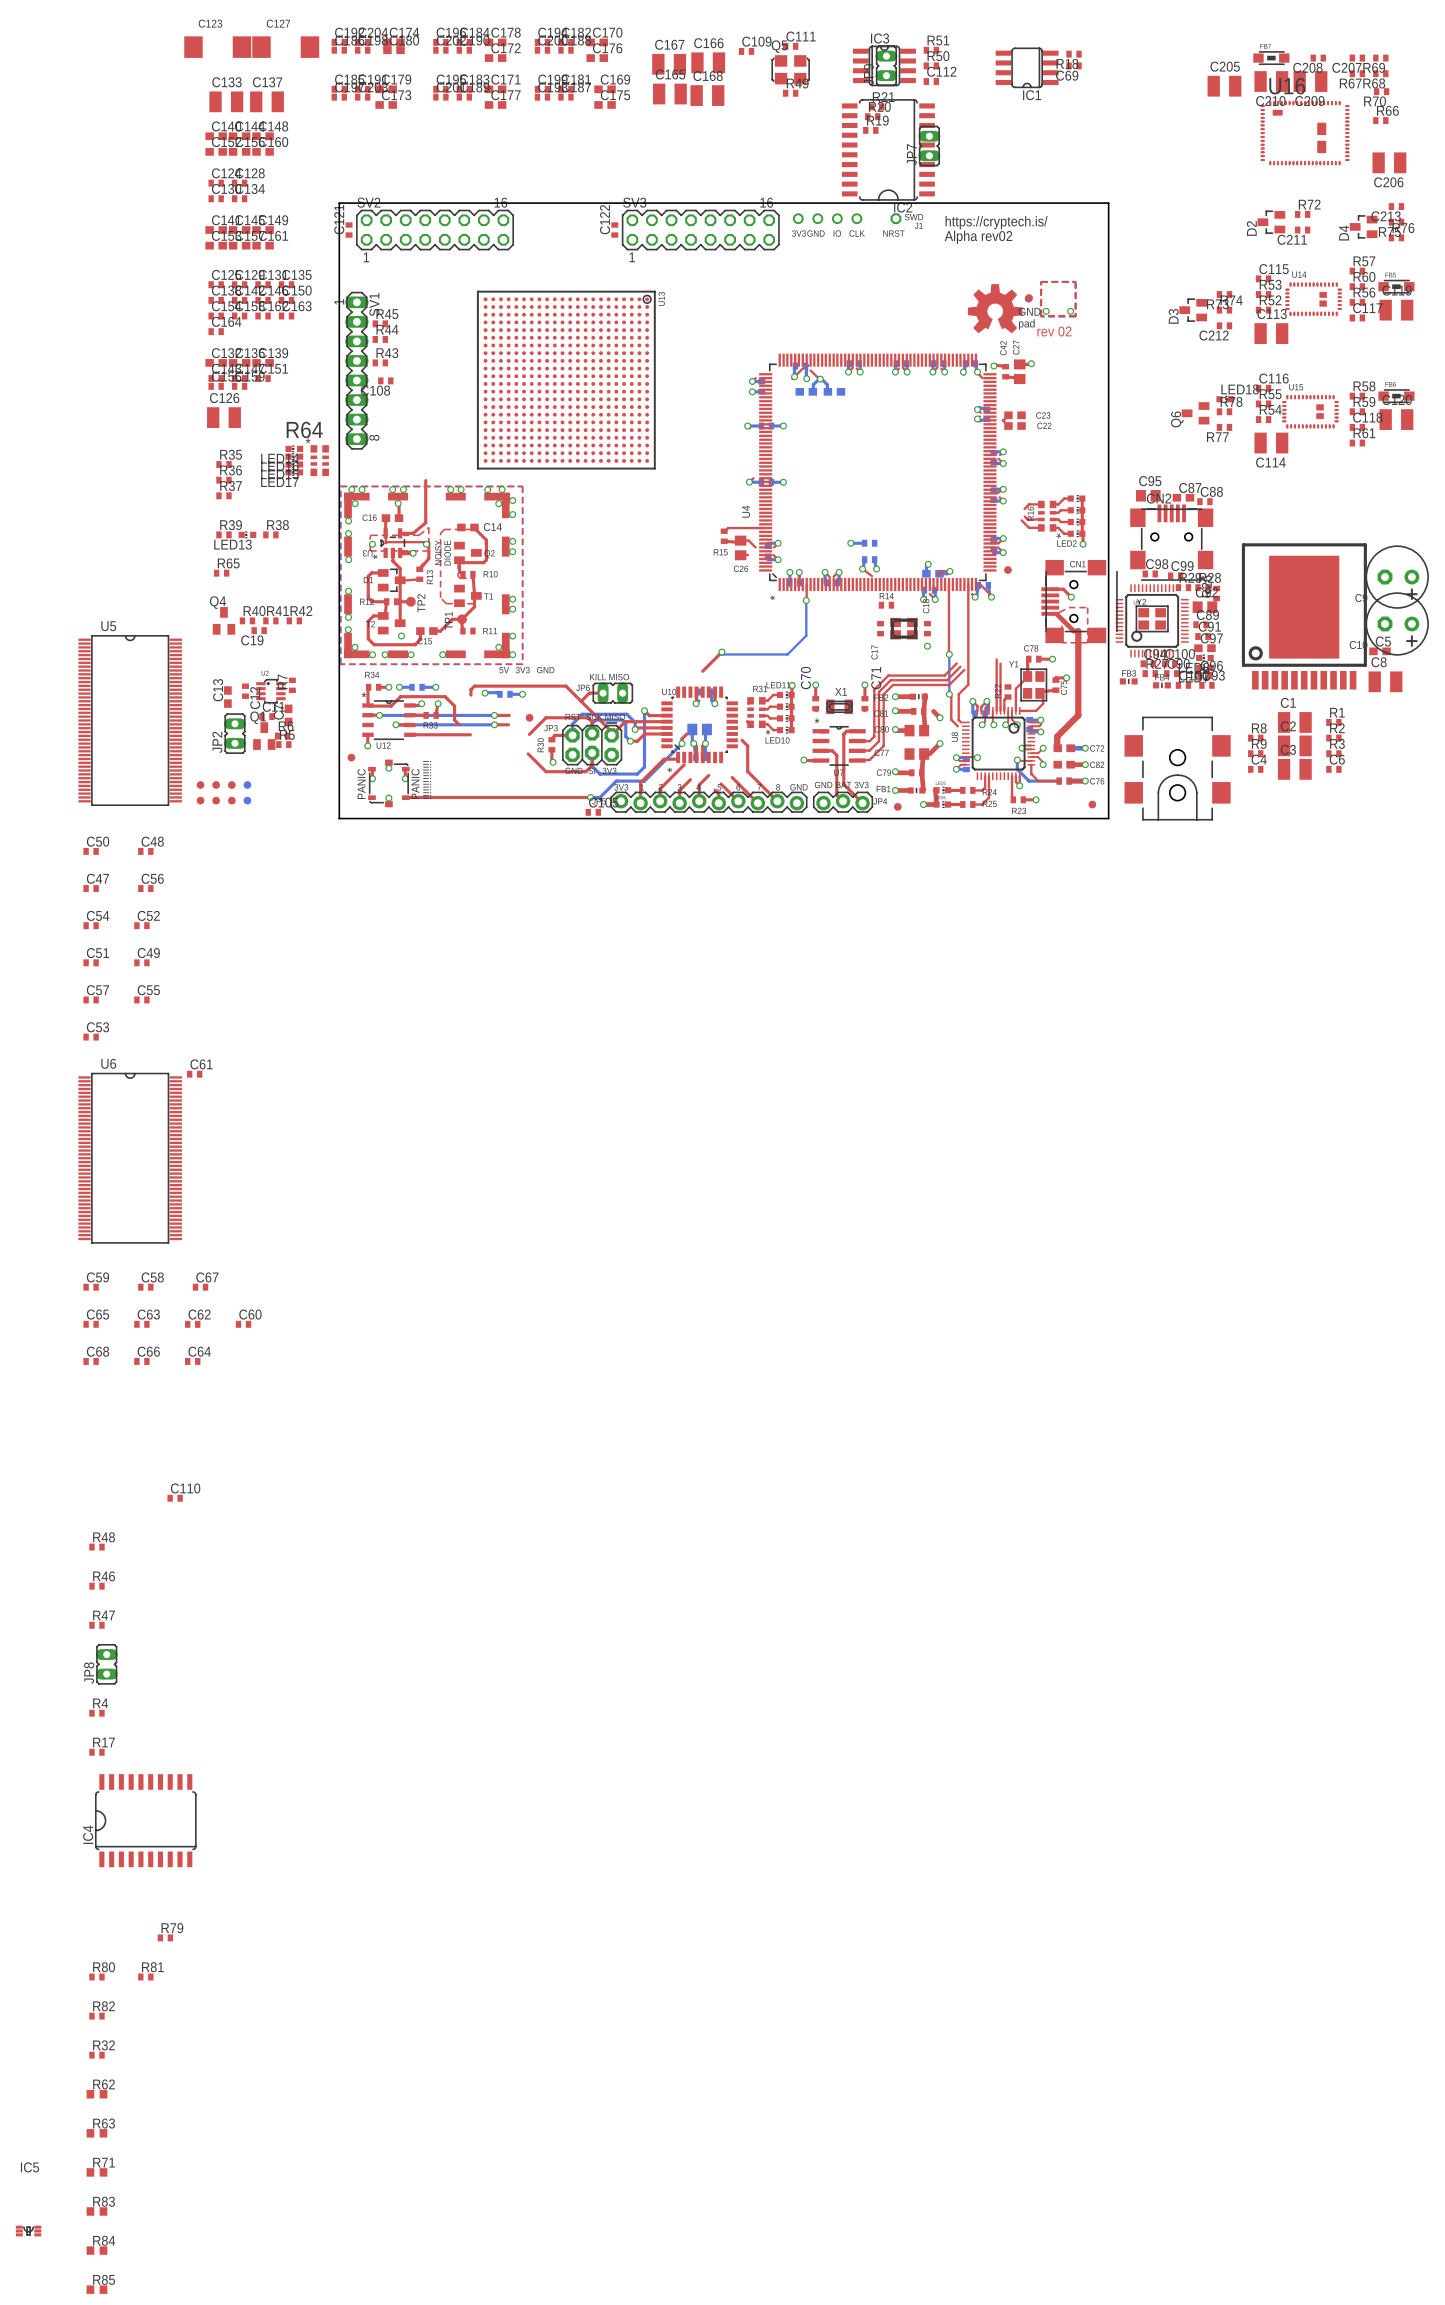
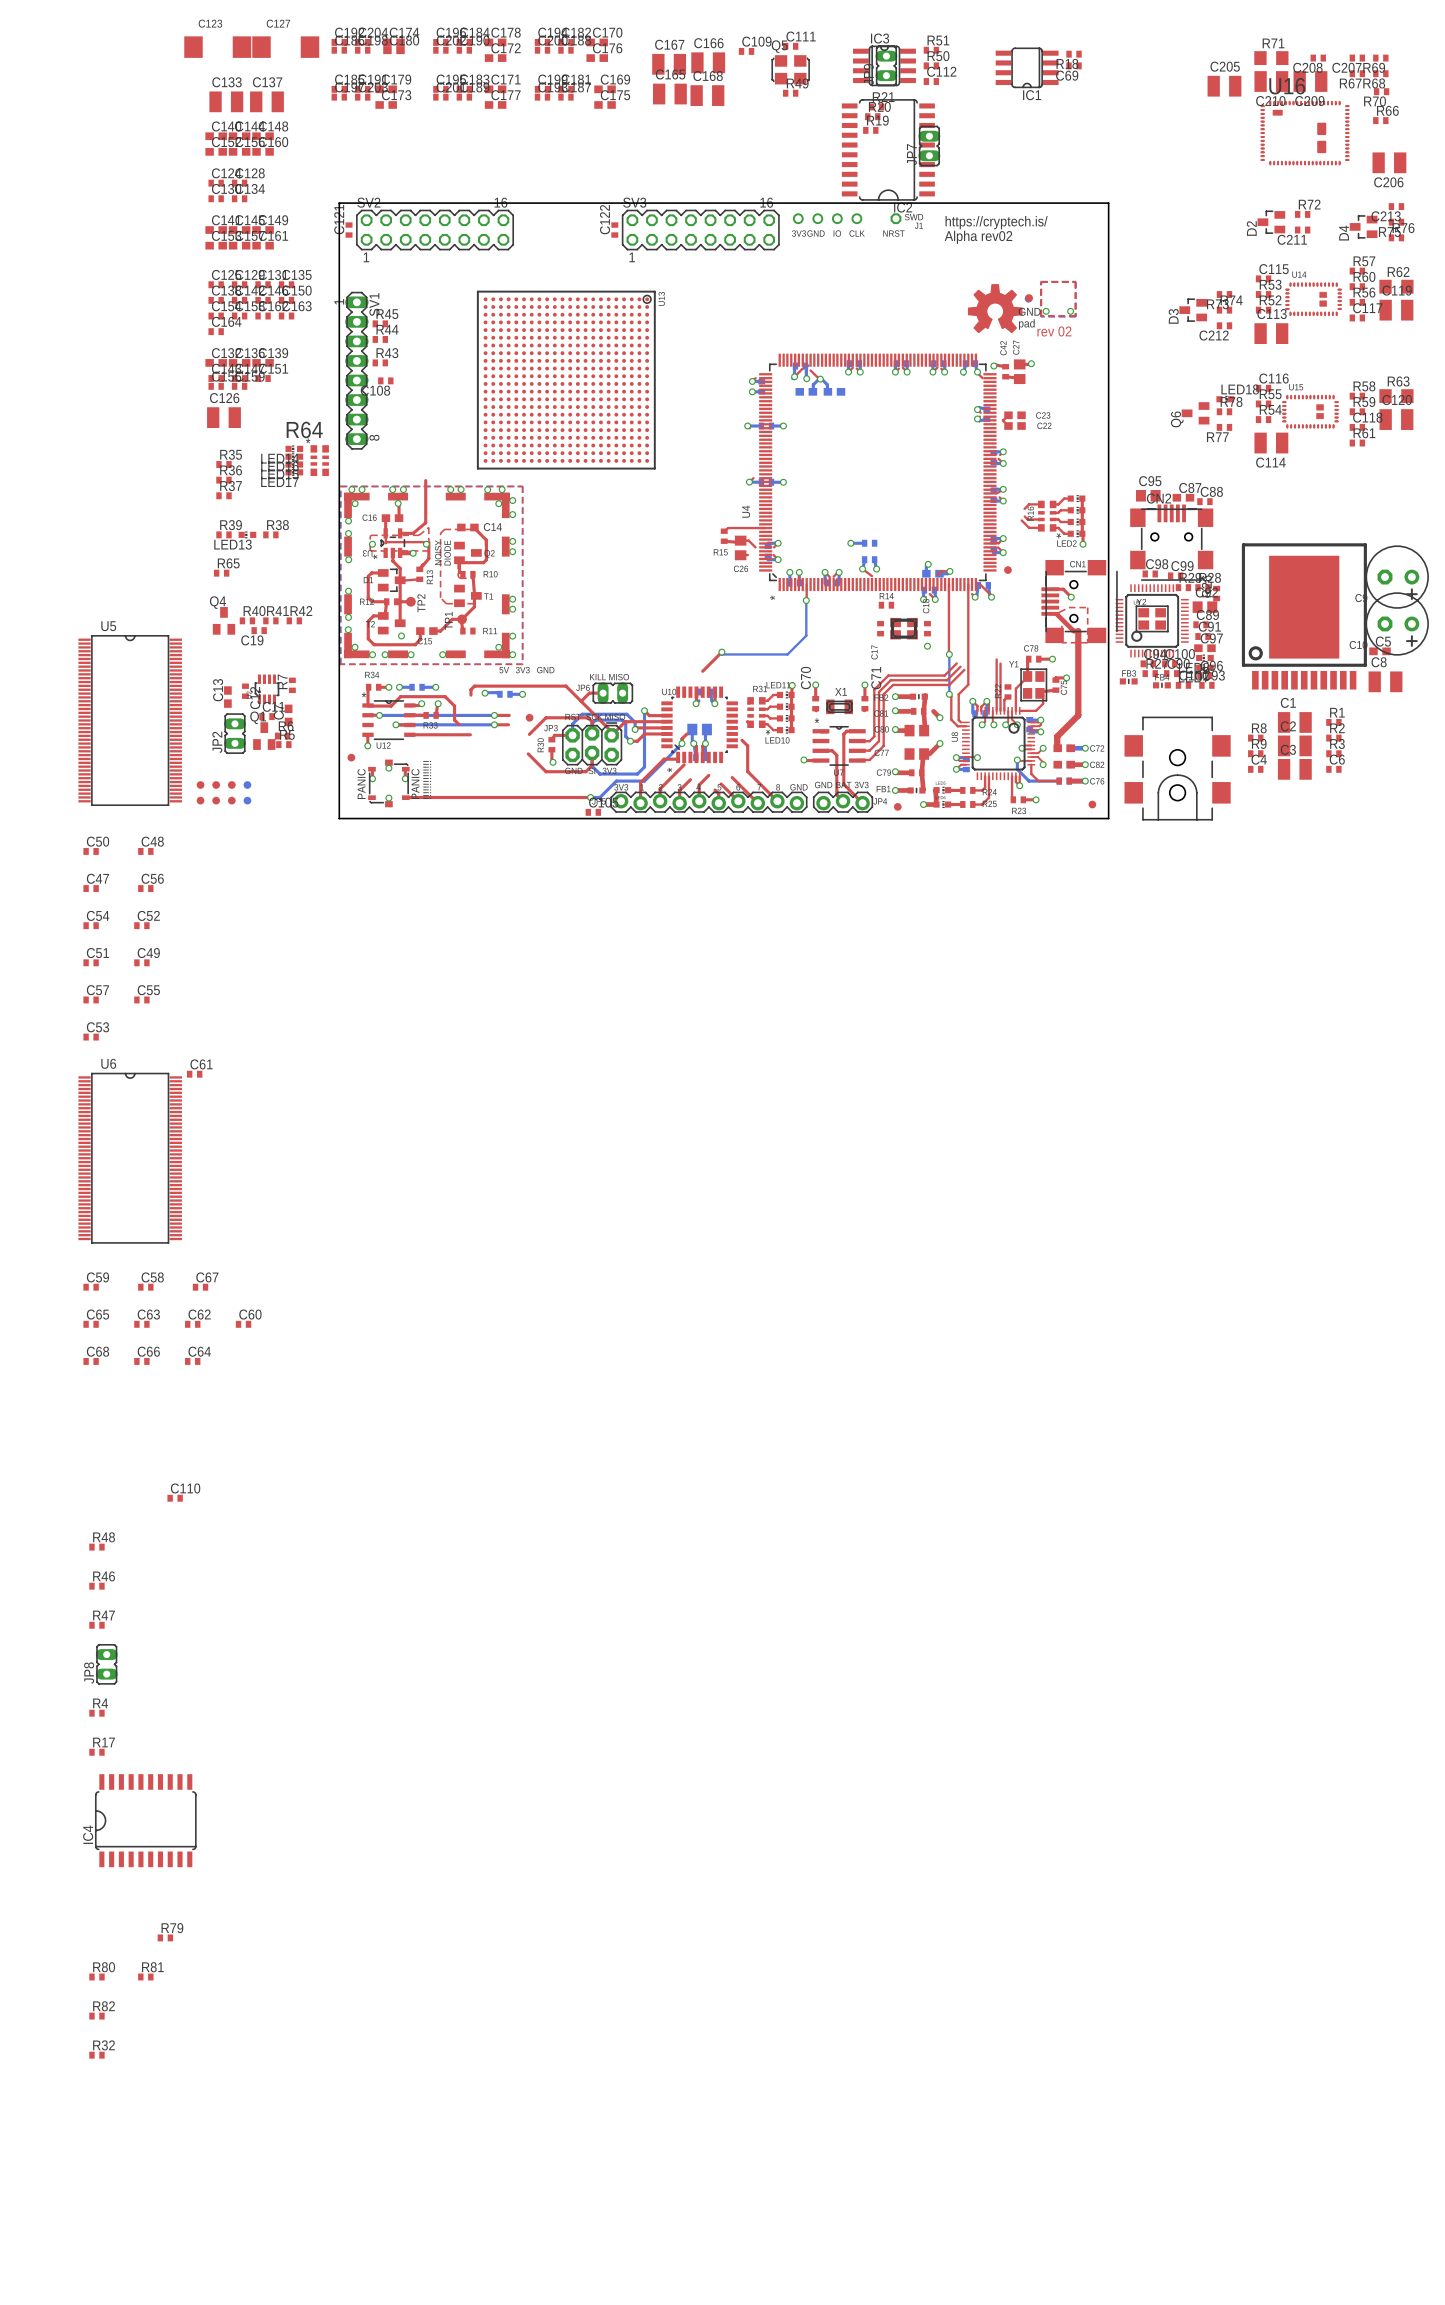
part: (1271, 58) -> none
part: (1396, 286) -> none
part: (1396, 396) -> none
part rotation: 0° (270, 691) -> 90° counterclockwise (266, 689)
top track: none -> (957, 726) (965, 726)
R62 footprint: [86, 2090, 108, 2099] -> [1379, 279, 1414, 294]
R63 footprint: [86, 2129, 108, 2138] -> [1379, 389, 1414, 404]
R71 footprint: [86, 2168, 108, 2177] -> [1254, 51, 1289, 66]
R83: (96, 2211) -> none
IC5: (28, 2231) -> none
R84: (96, 2250) -> none
R85: (96, 2289) -> none

